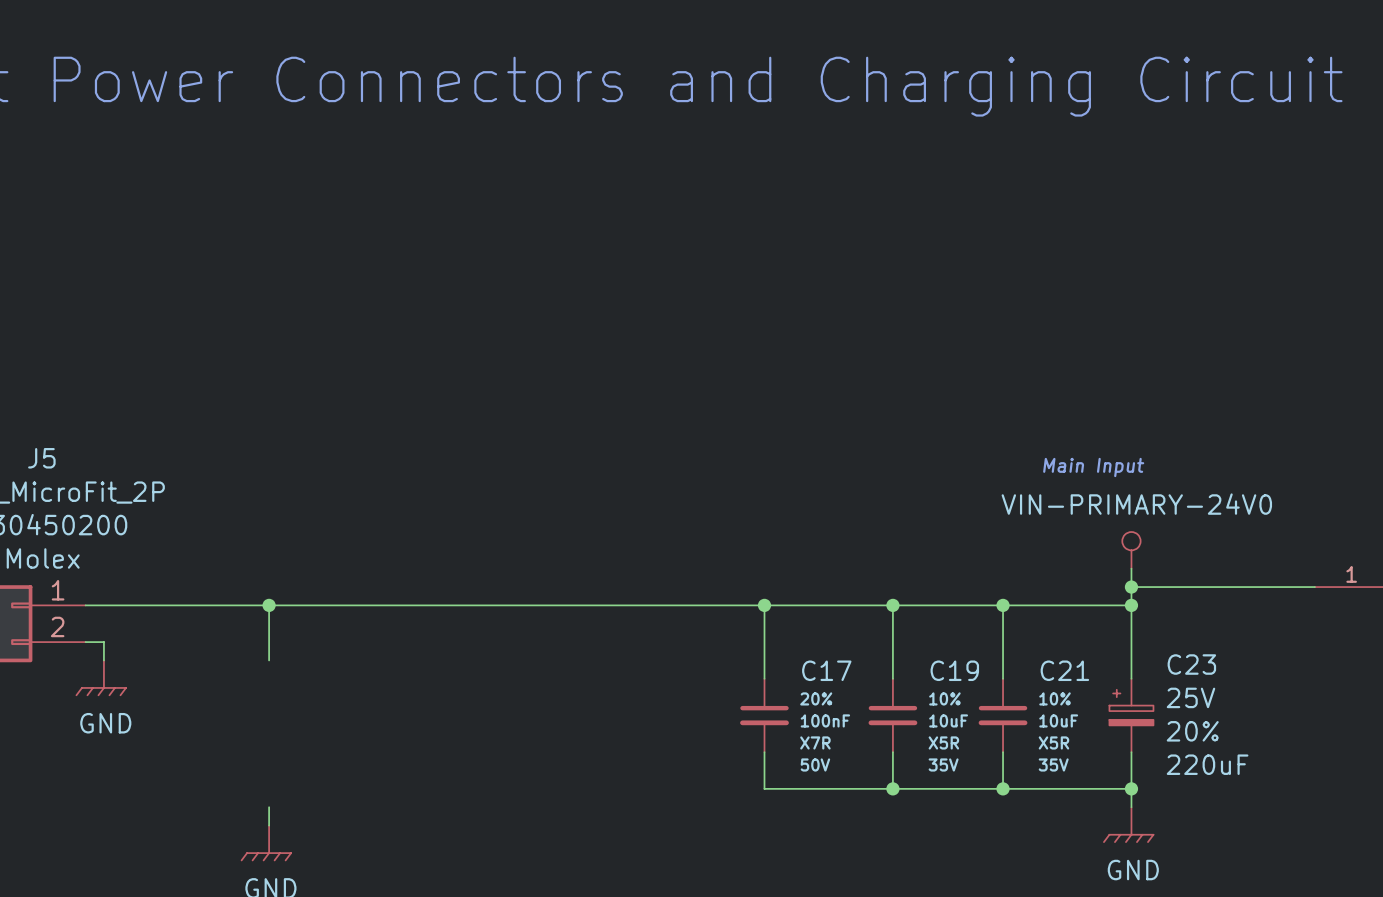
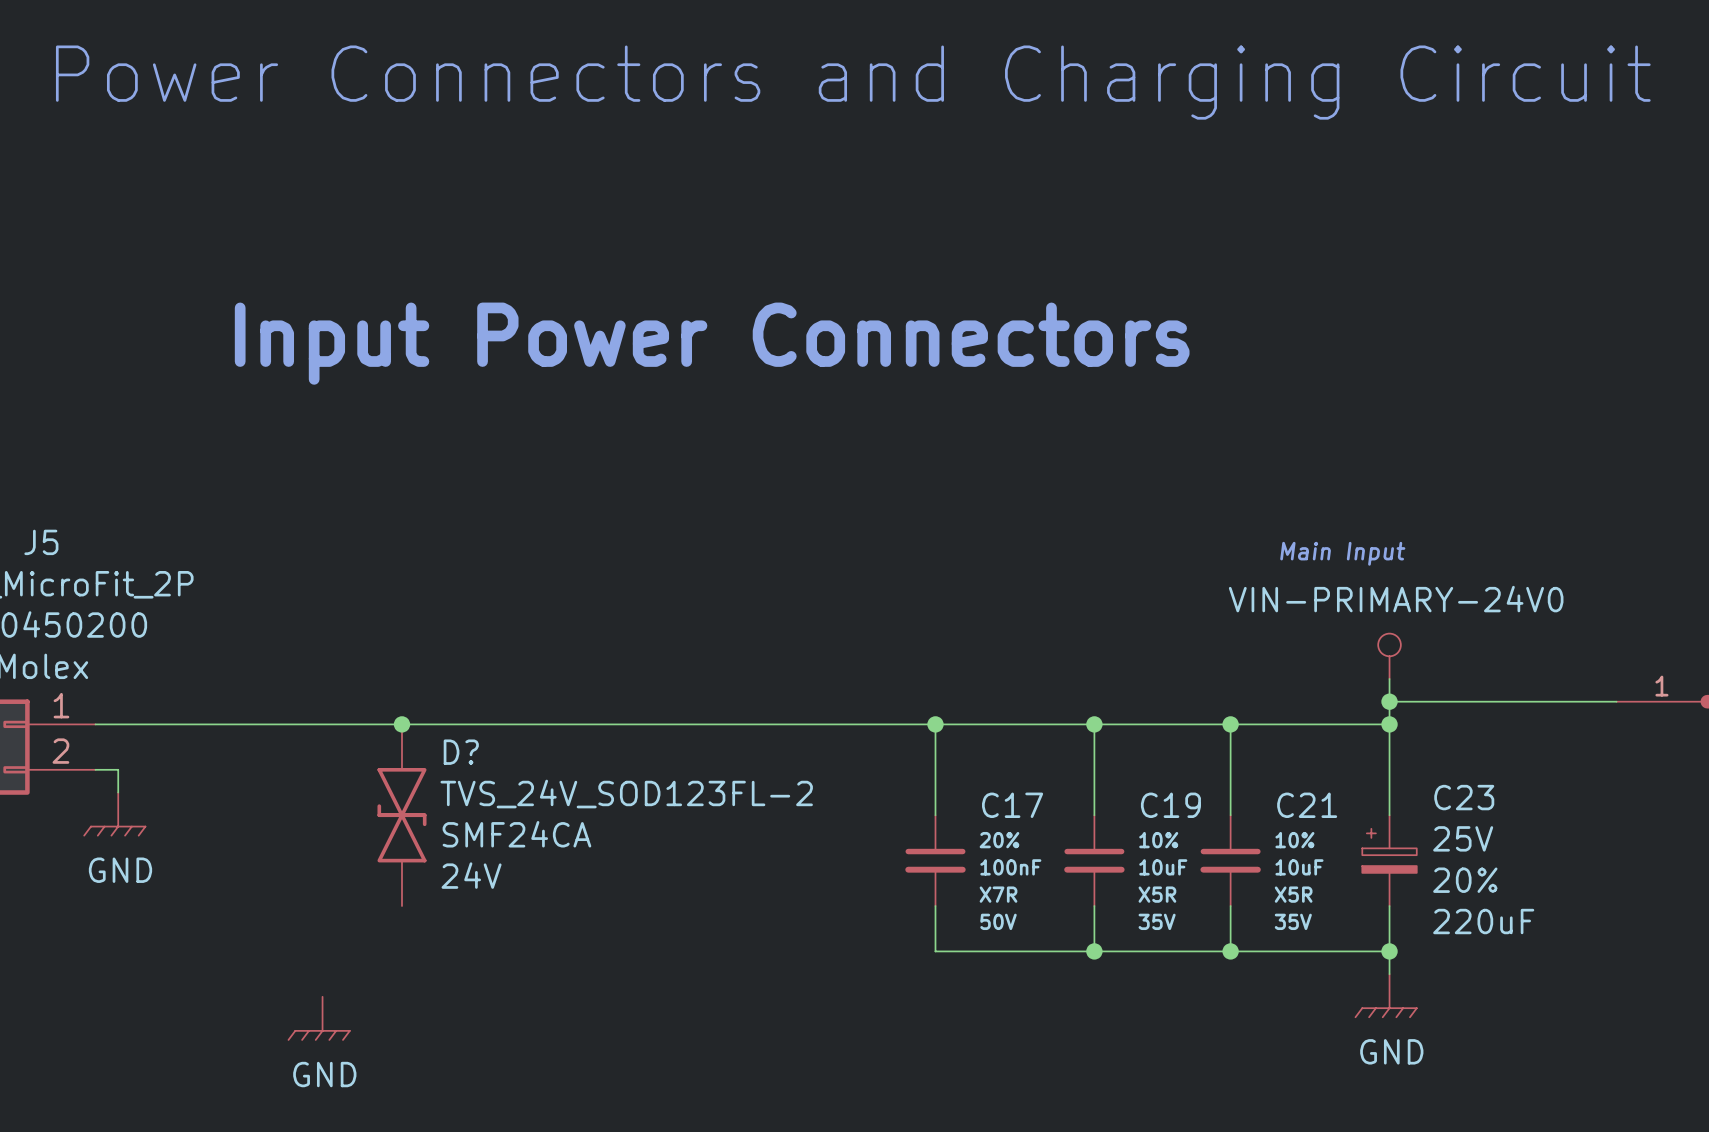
text: none -> Input Power Connectors (712, 343)
wire: (269, 605) (269, 660) -> none
junction position: (269, 605) -> (401, 724)
D?: none -> TVS_24V_SOD123FL-2 (401, 815)
wire: (269, 807) (269, 825) -> none

